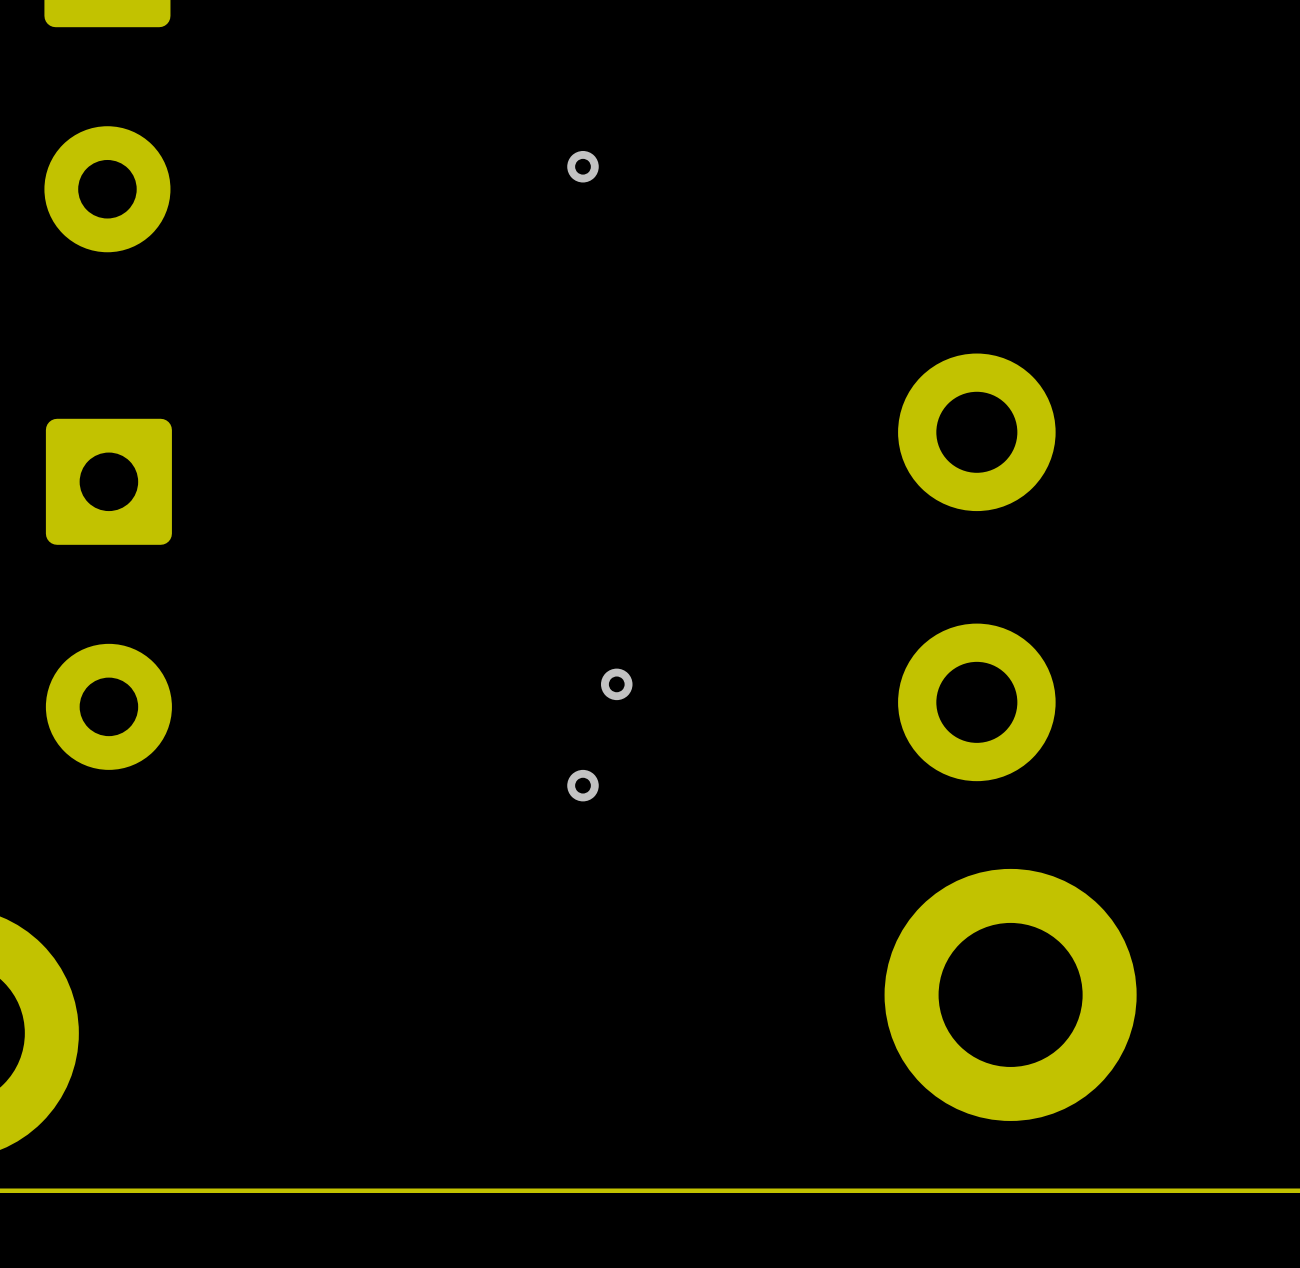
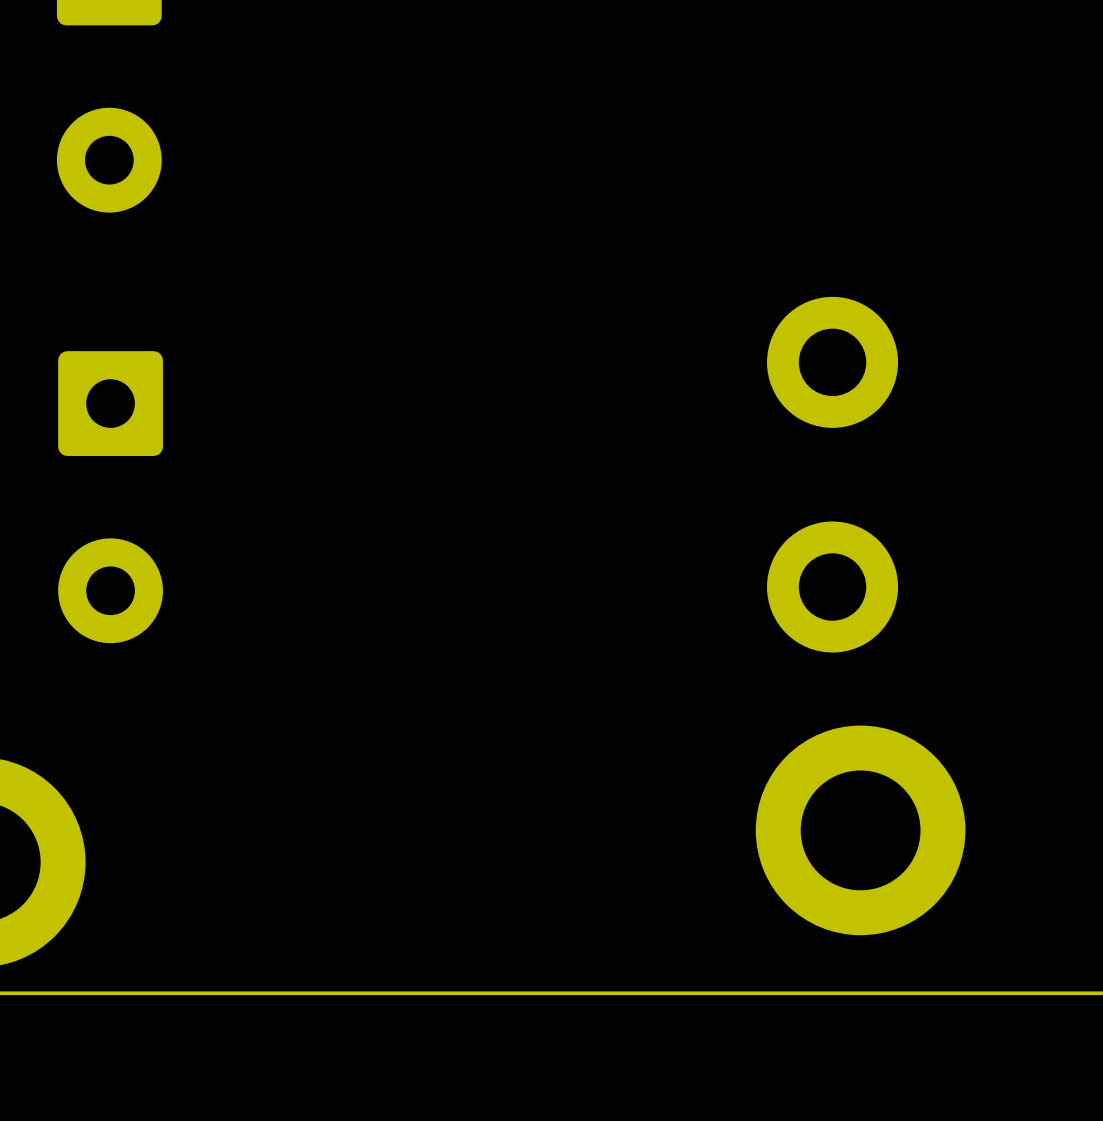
via: (582, 166) -> none
via: (616, 684) -> none
via: (582, 785) -> none

